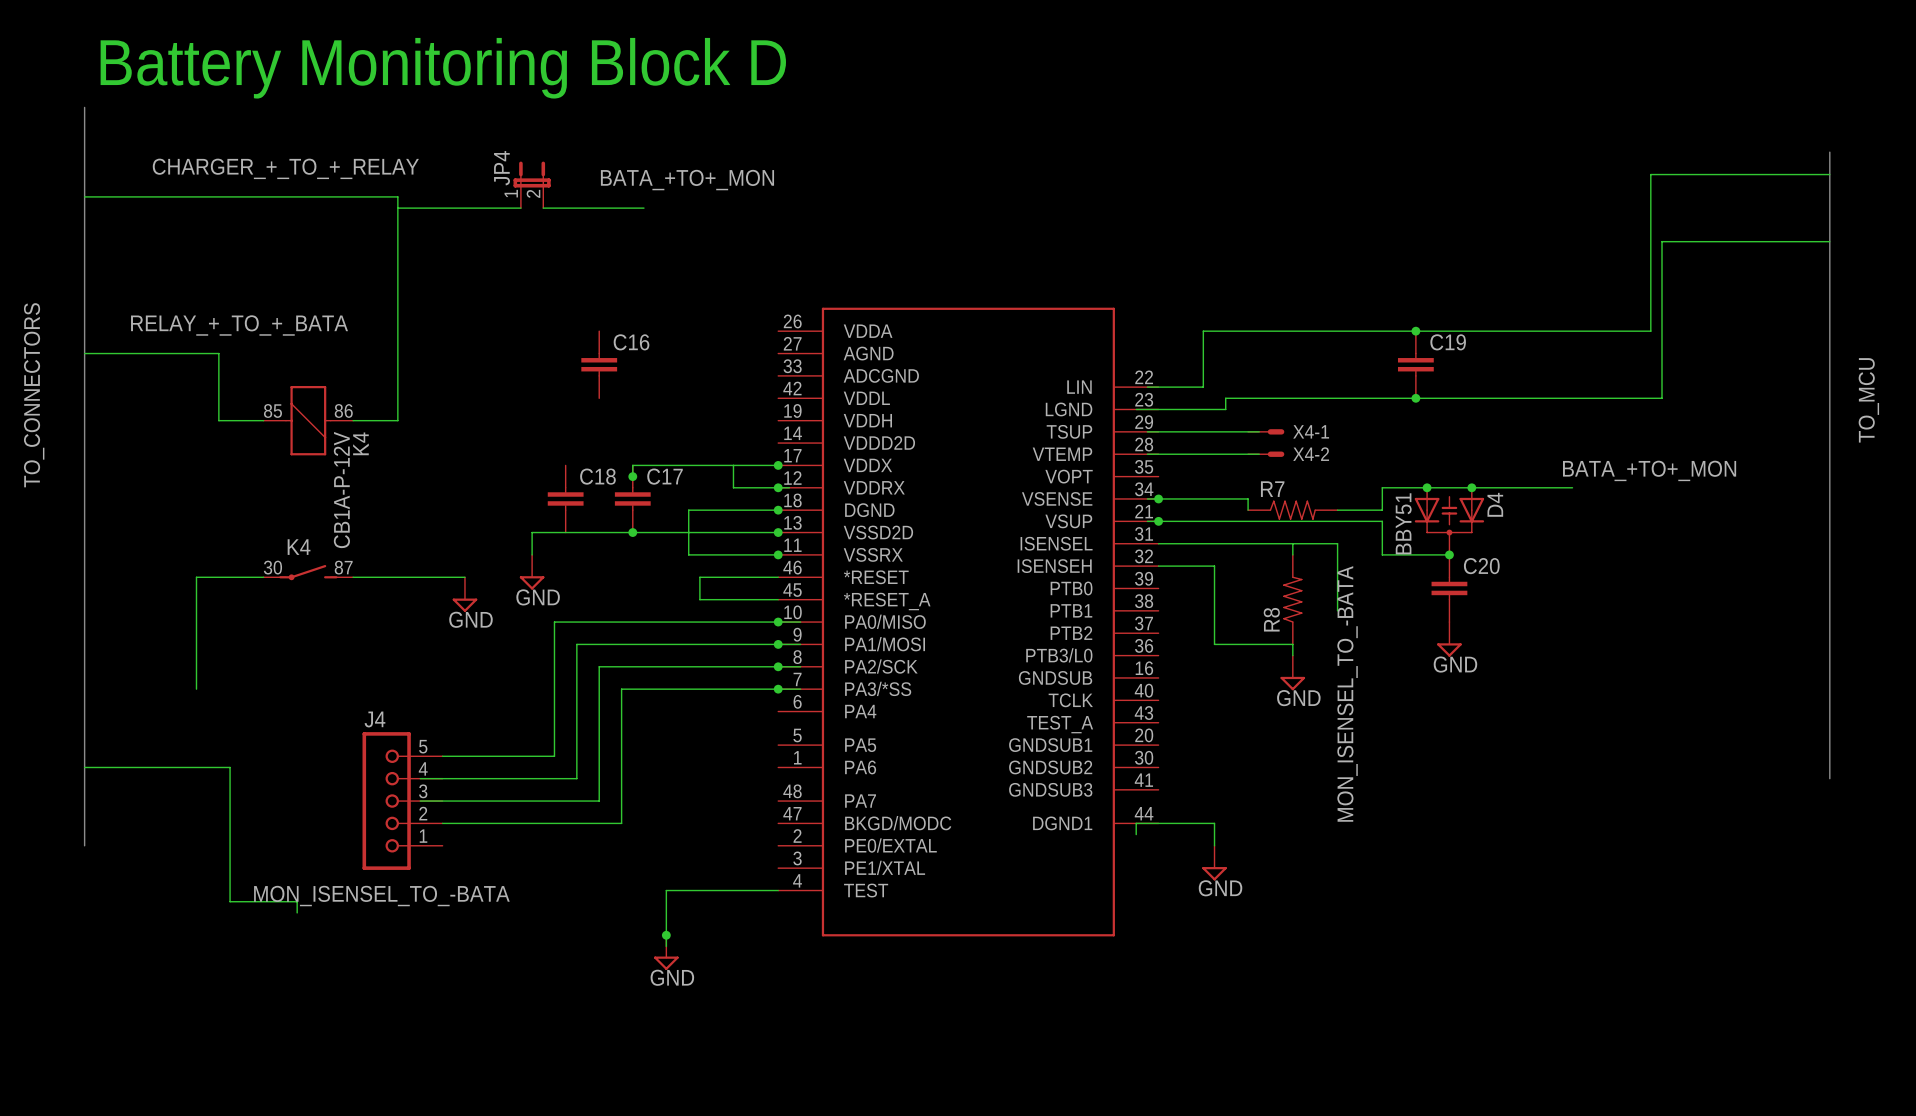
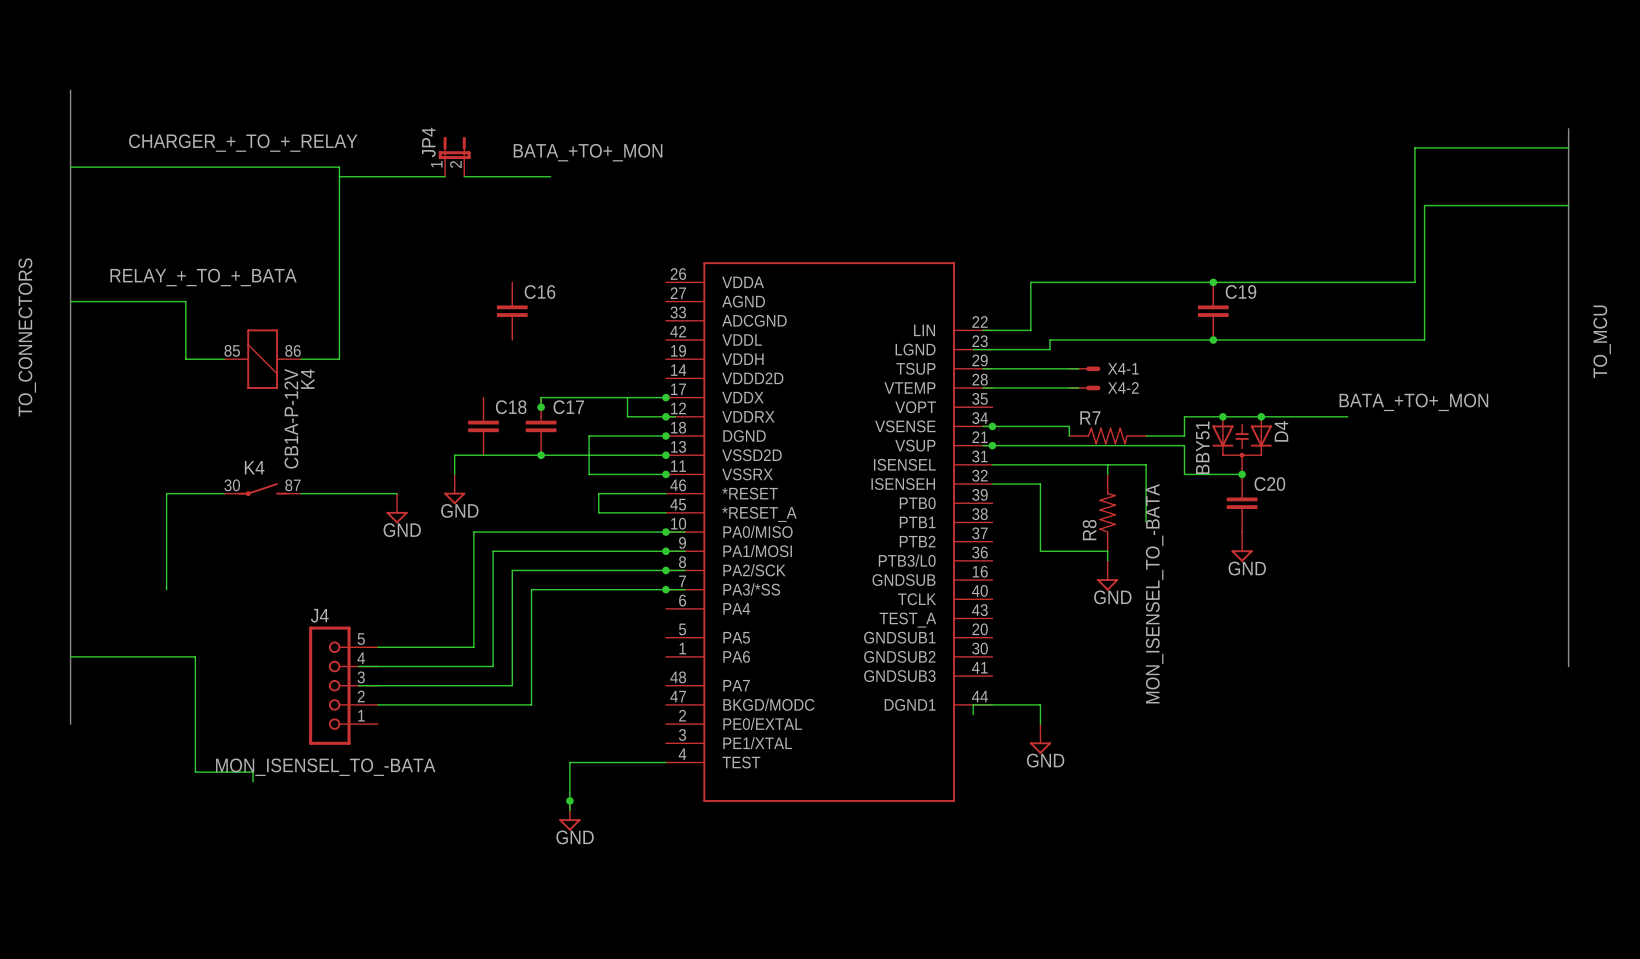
text: Battery Monitoring Block D (443, 68) -> none

